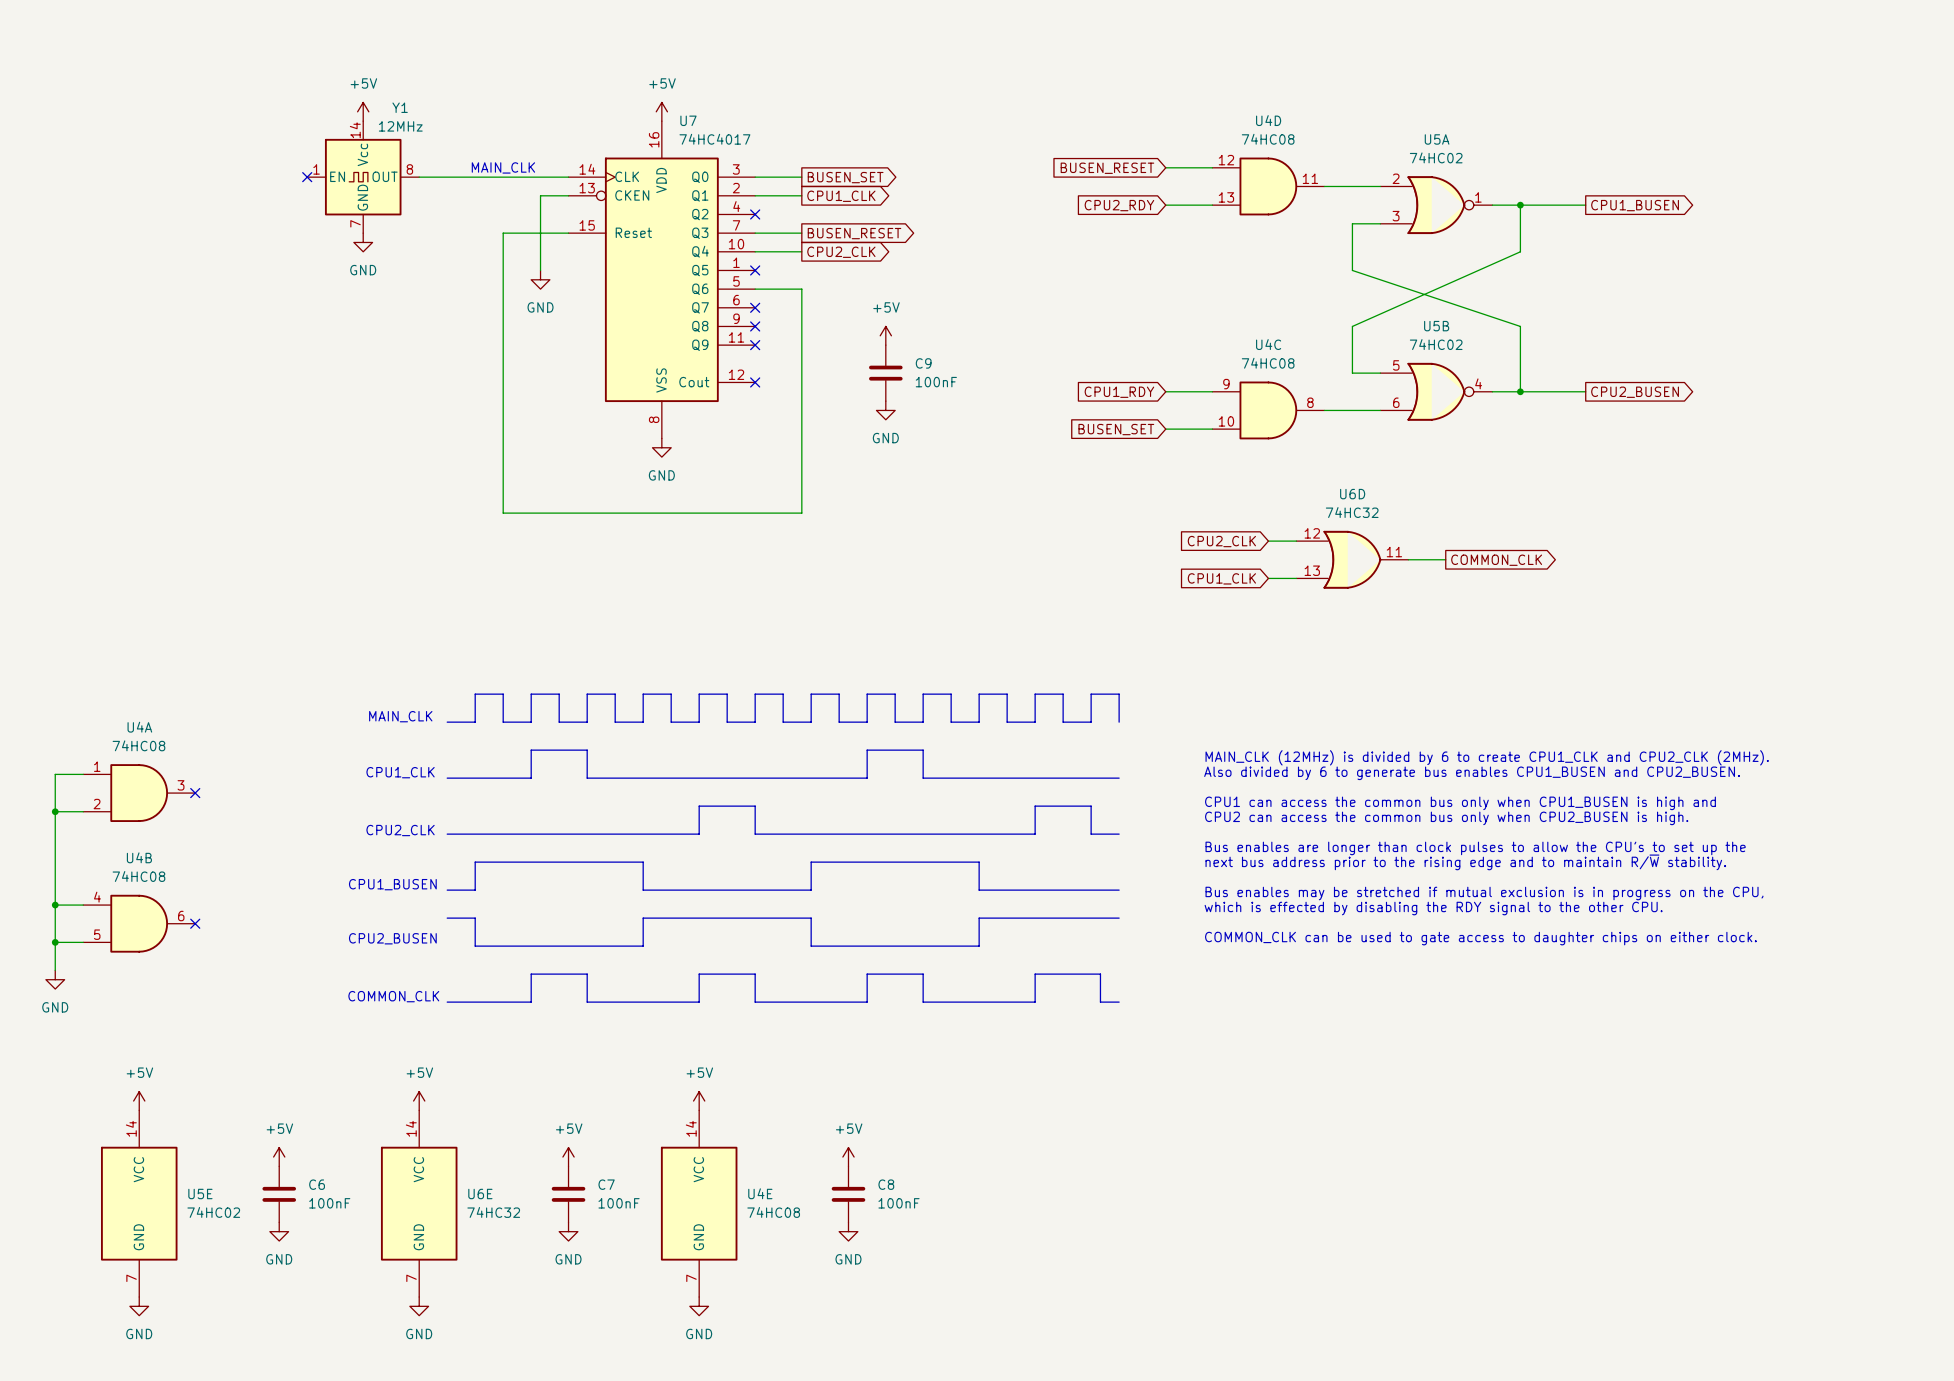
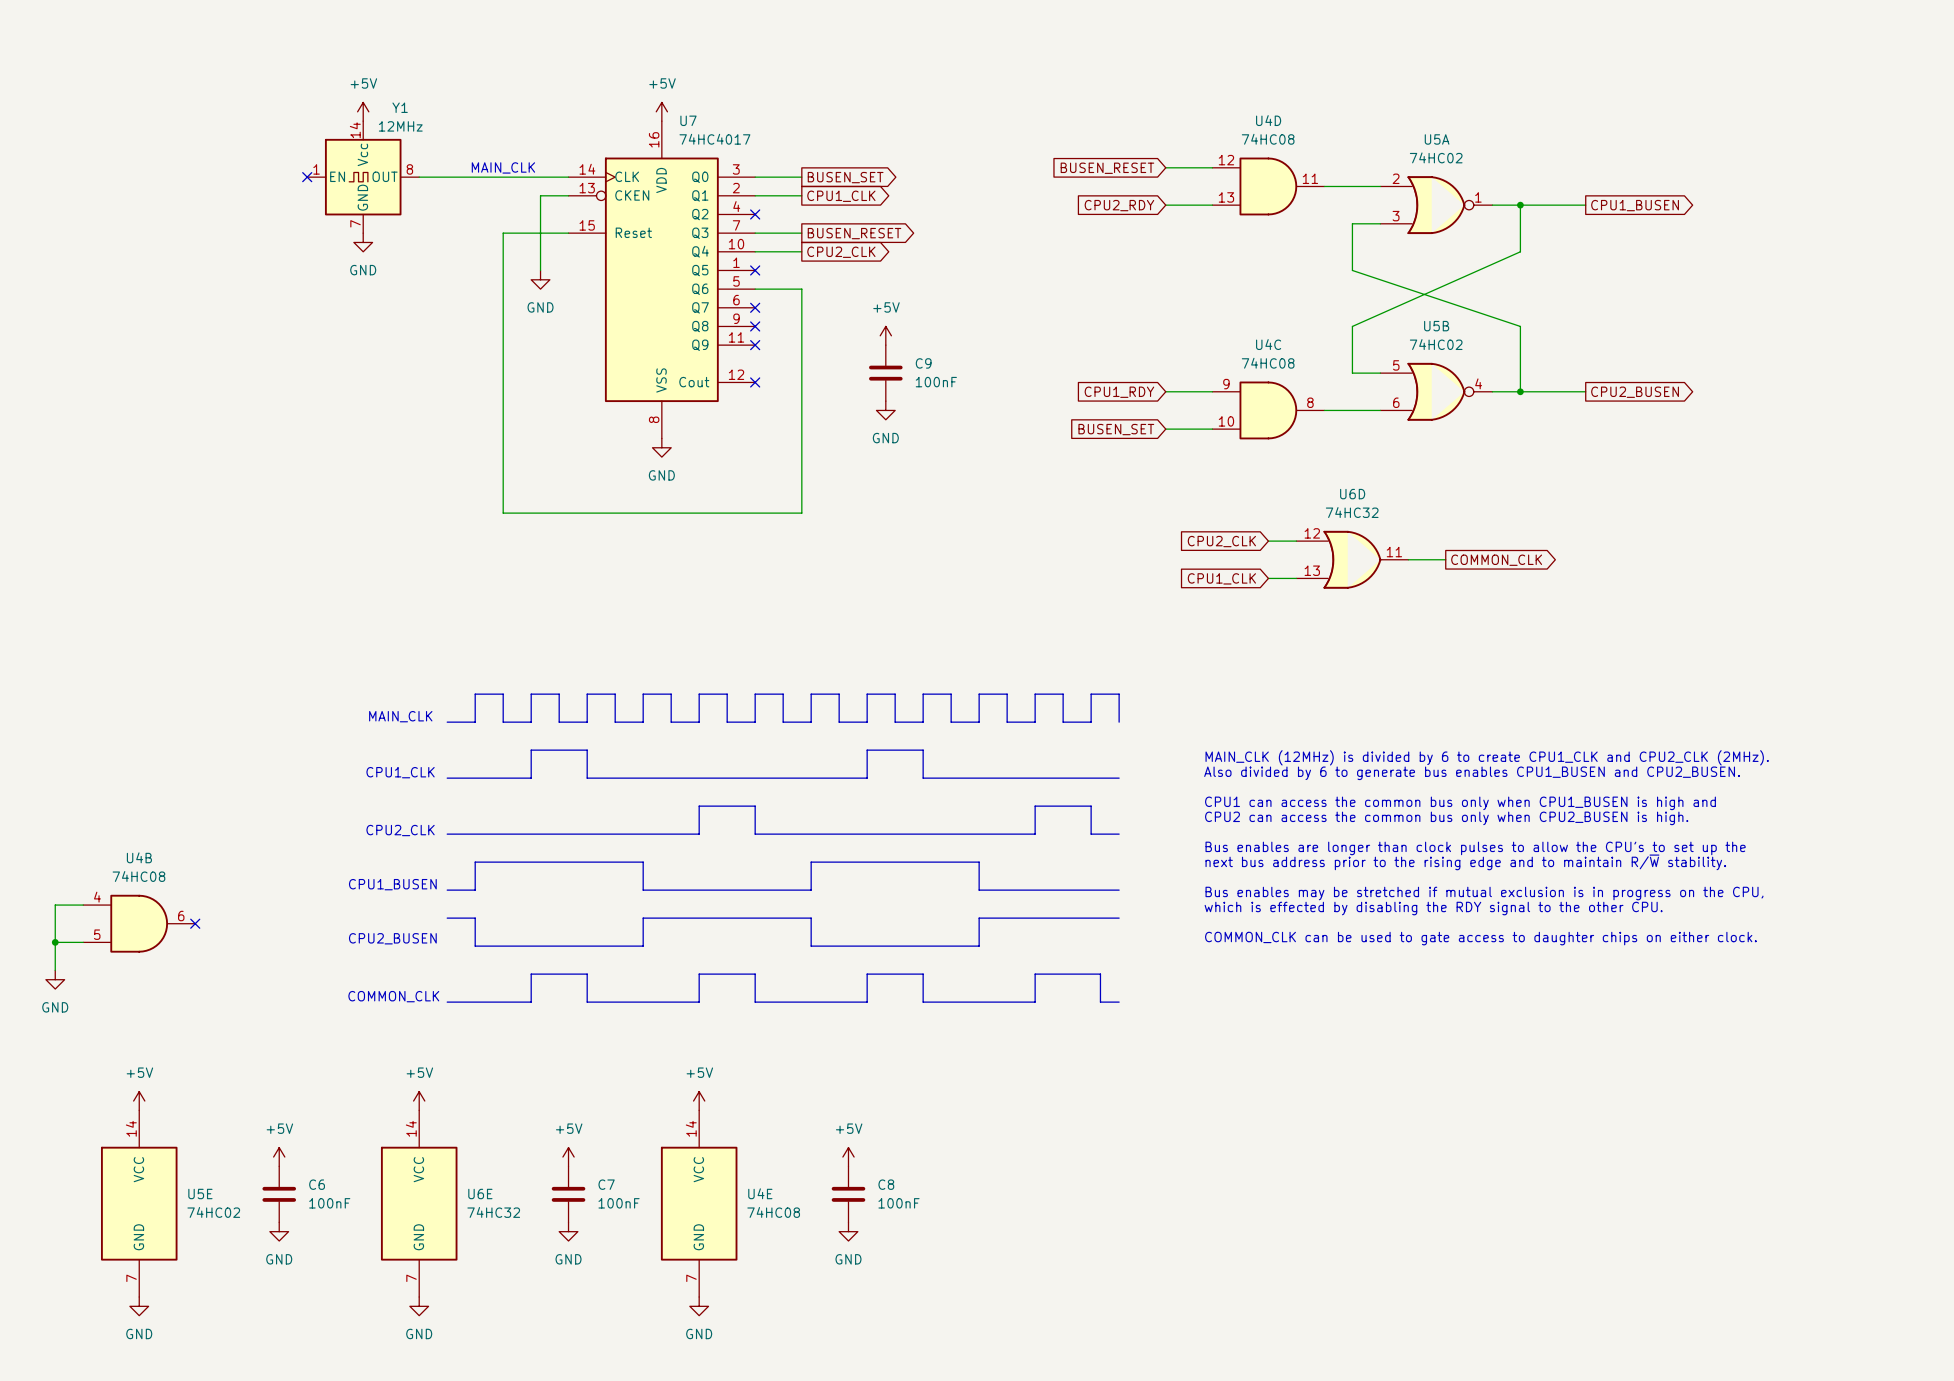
wire: (83, 774) (55, 774) (55, 905) -> none
U4A: 74HC08 (139, 793) -> none
no-connect mark: (195, 793) -> none
wire: (55, 811) (83, 811) -> none
junction: (55, 811) -> none
junction: (55, 905) -> none

